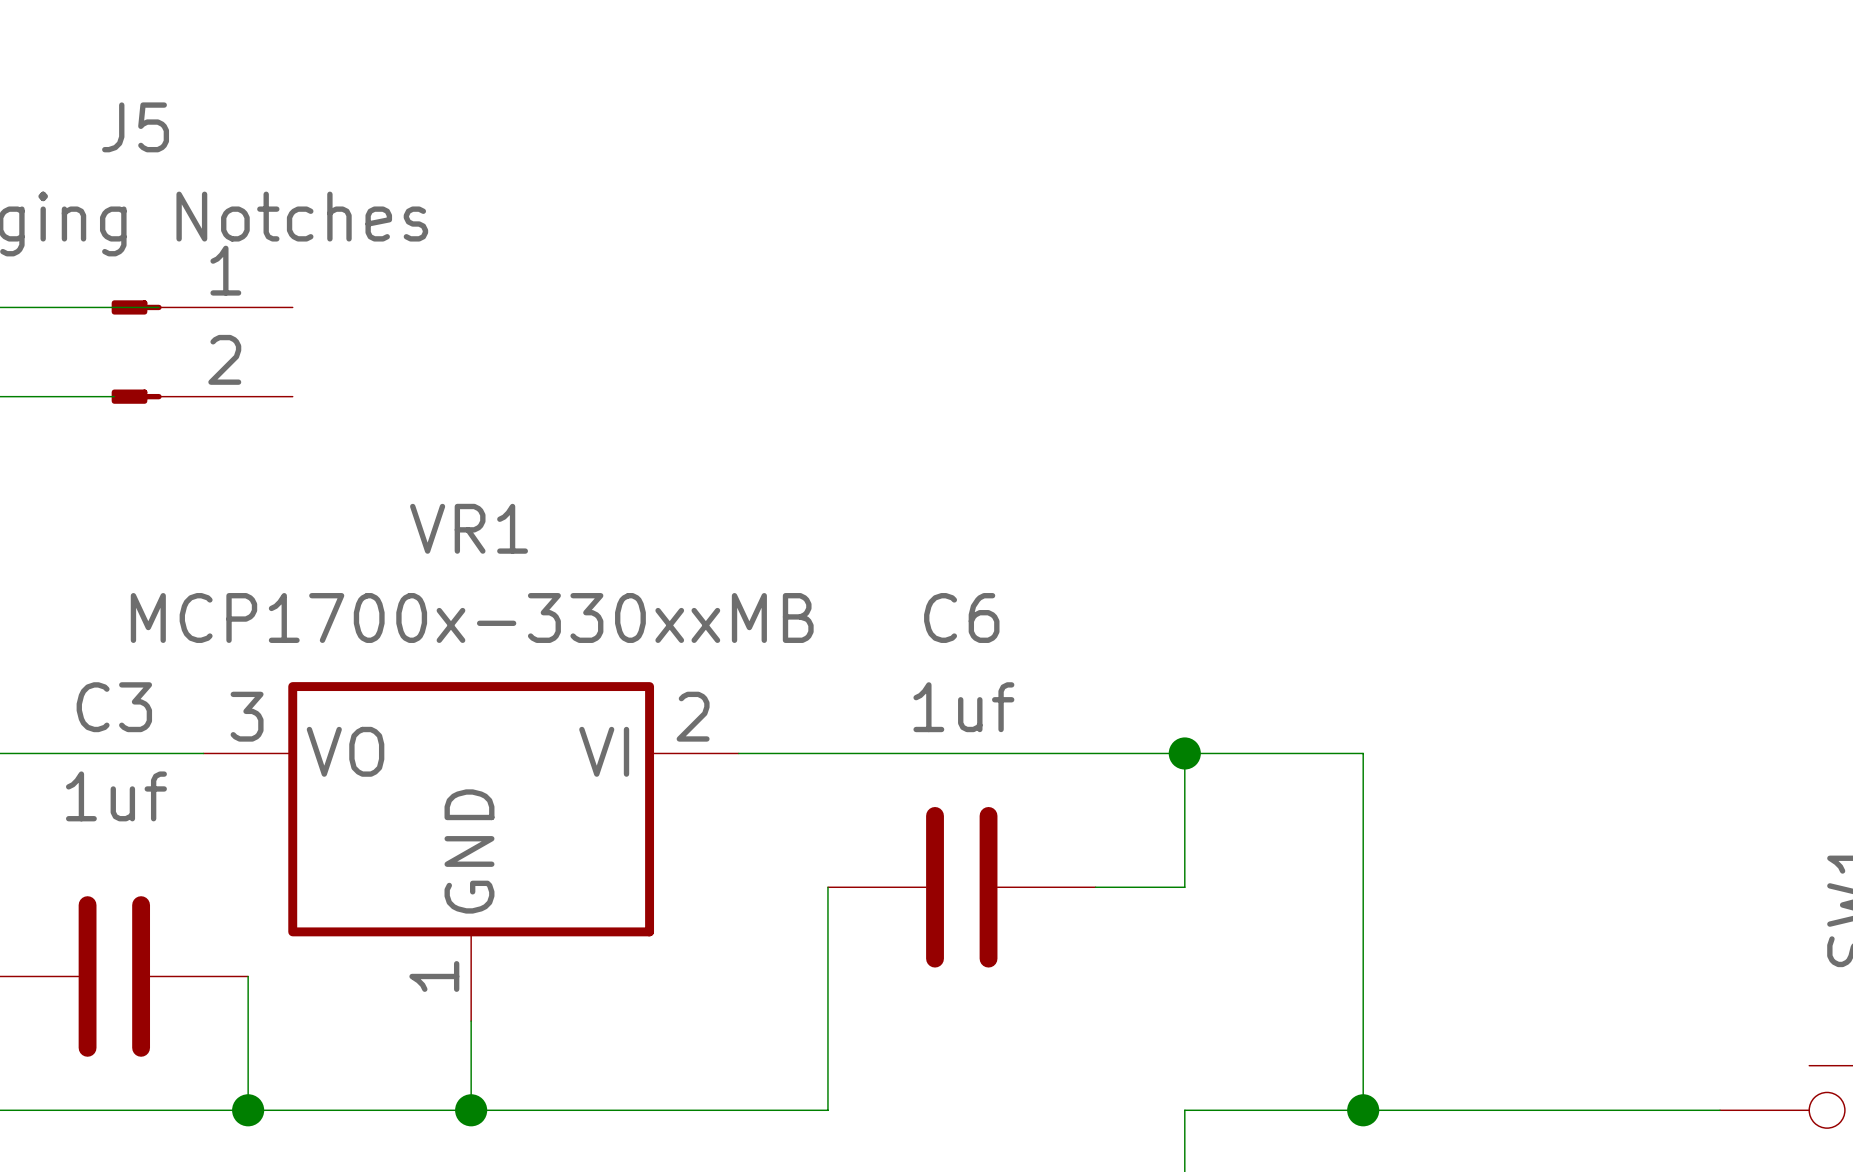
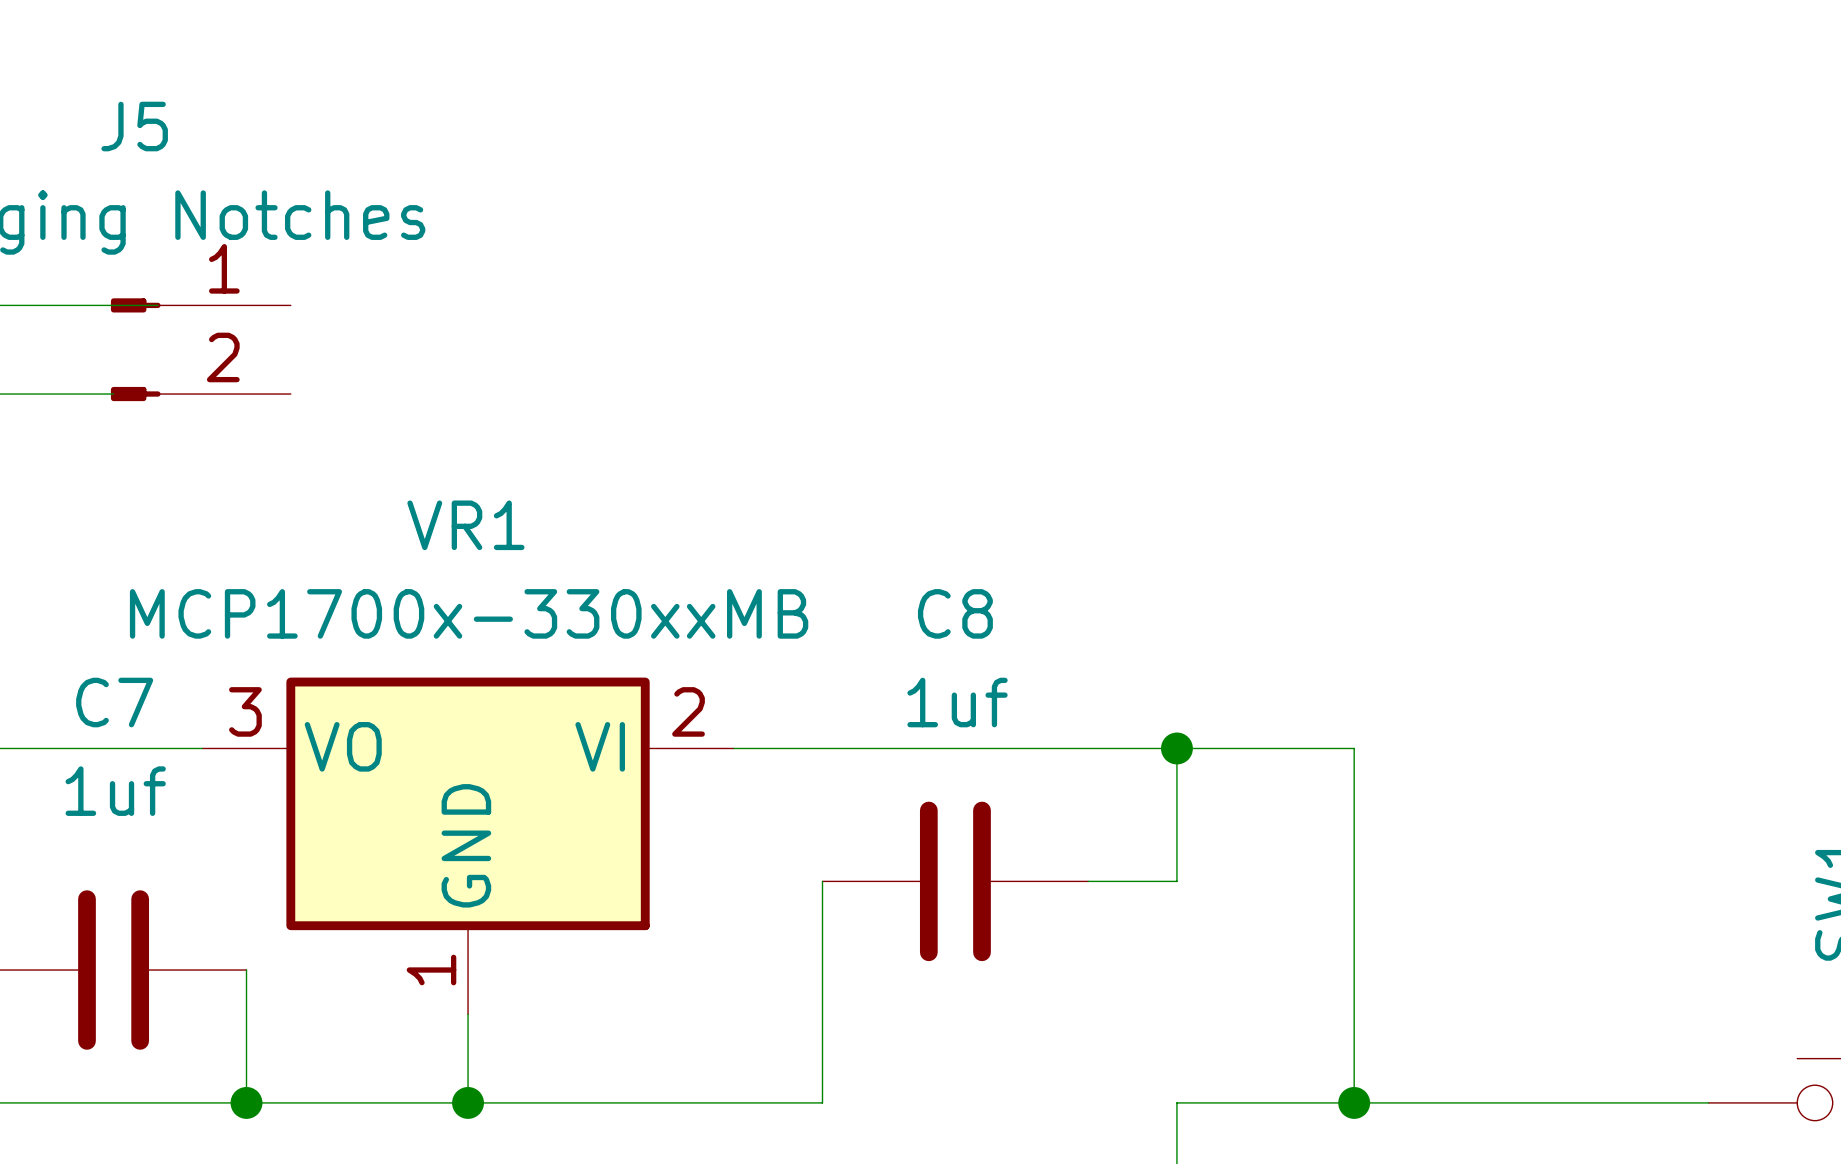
C6 name: C6 (961, 617) -> C8 (955, 613)
C3 name: C3 (114, 707) -> C7 (114, 702)

